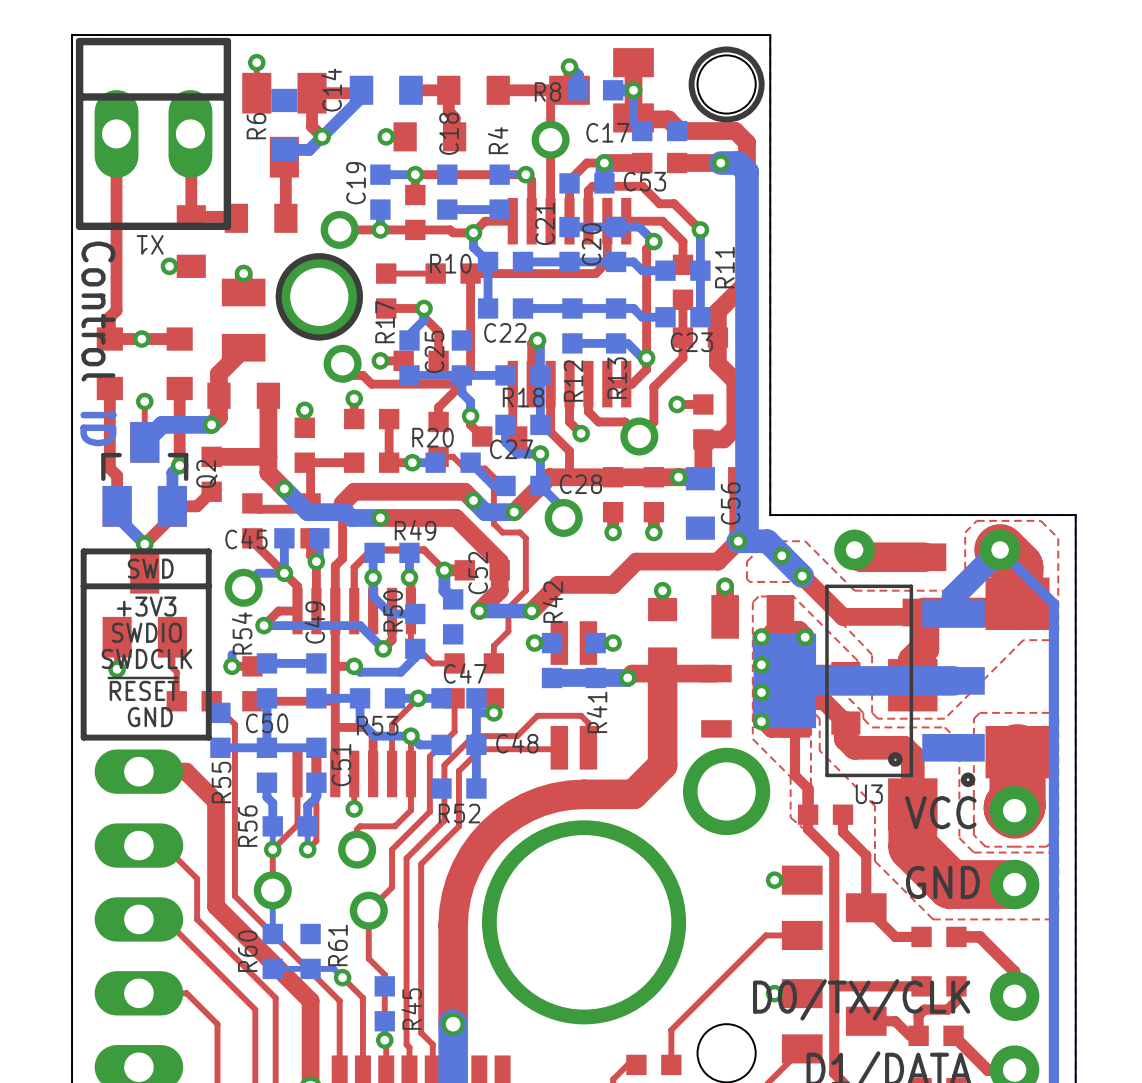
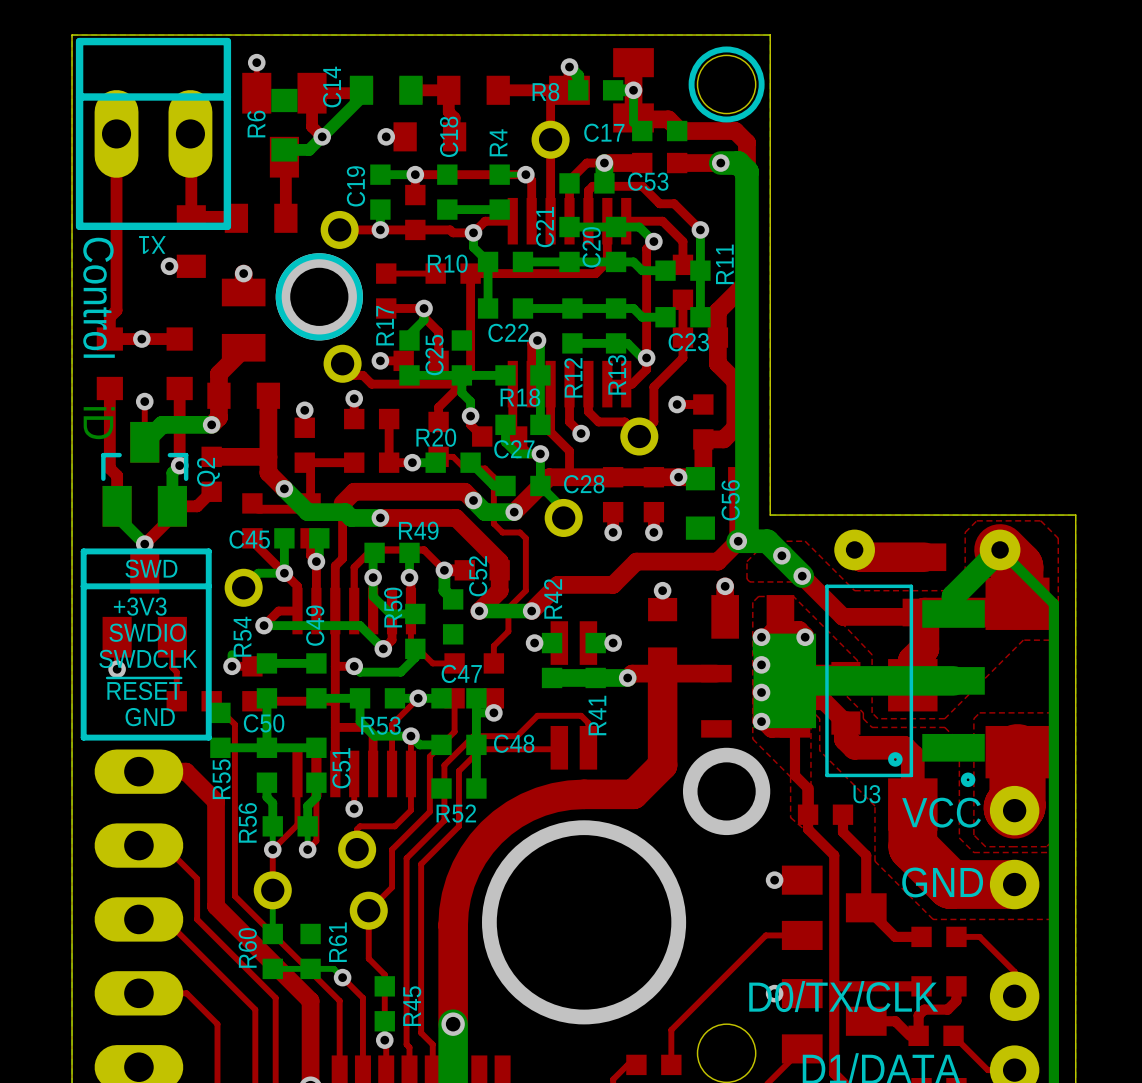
top track width: thick (956, 936) (979, 936) (1014, 971) (1014, 996) -> thin (956, 936) (979, 936) (1014, 971) (1014, 996)
top track width: thick (953, 1035) (987, 1070) (1014, 1070) -> thin (953, 1035) (987, 1070) (1014, 1070)

